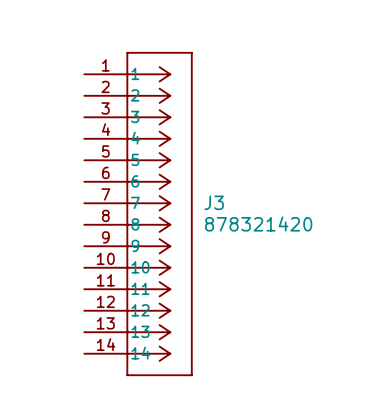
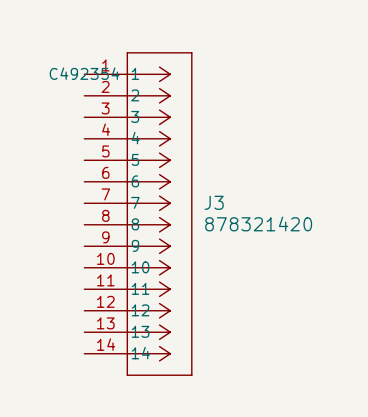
J3 text: none -> C492354 (84, 73)

